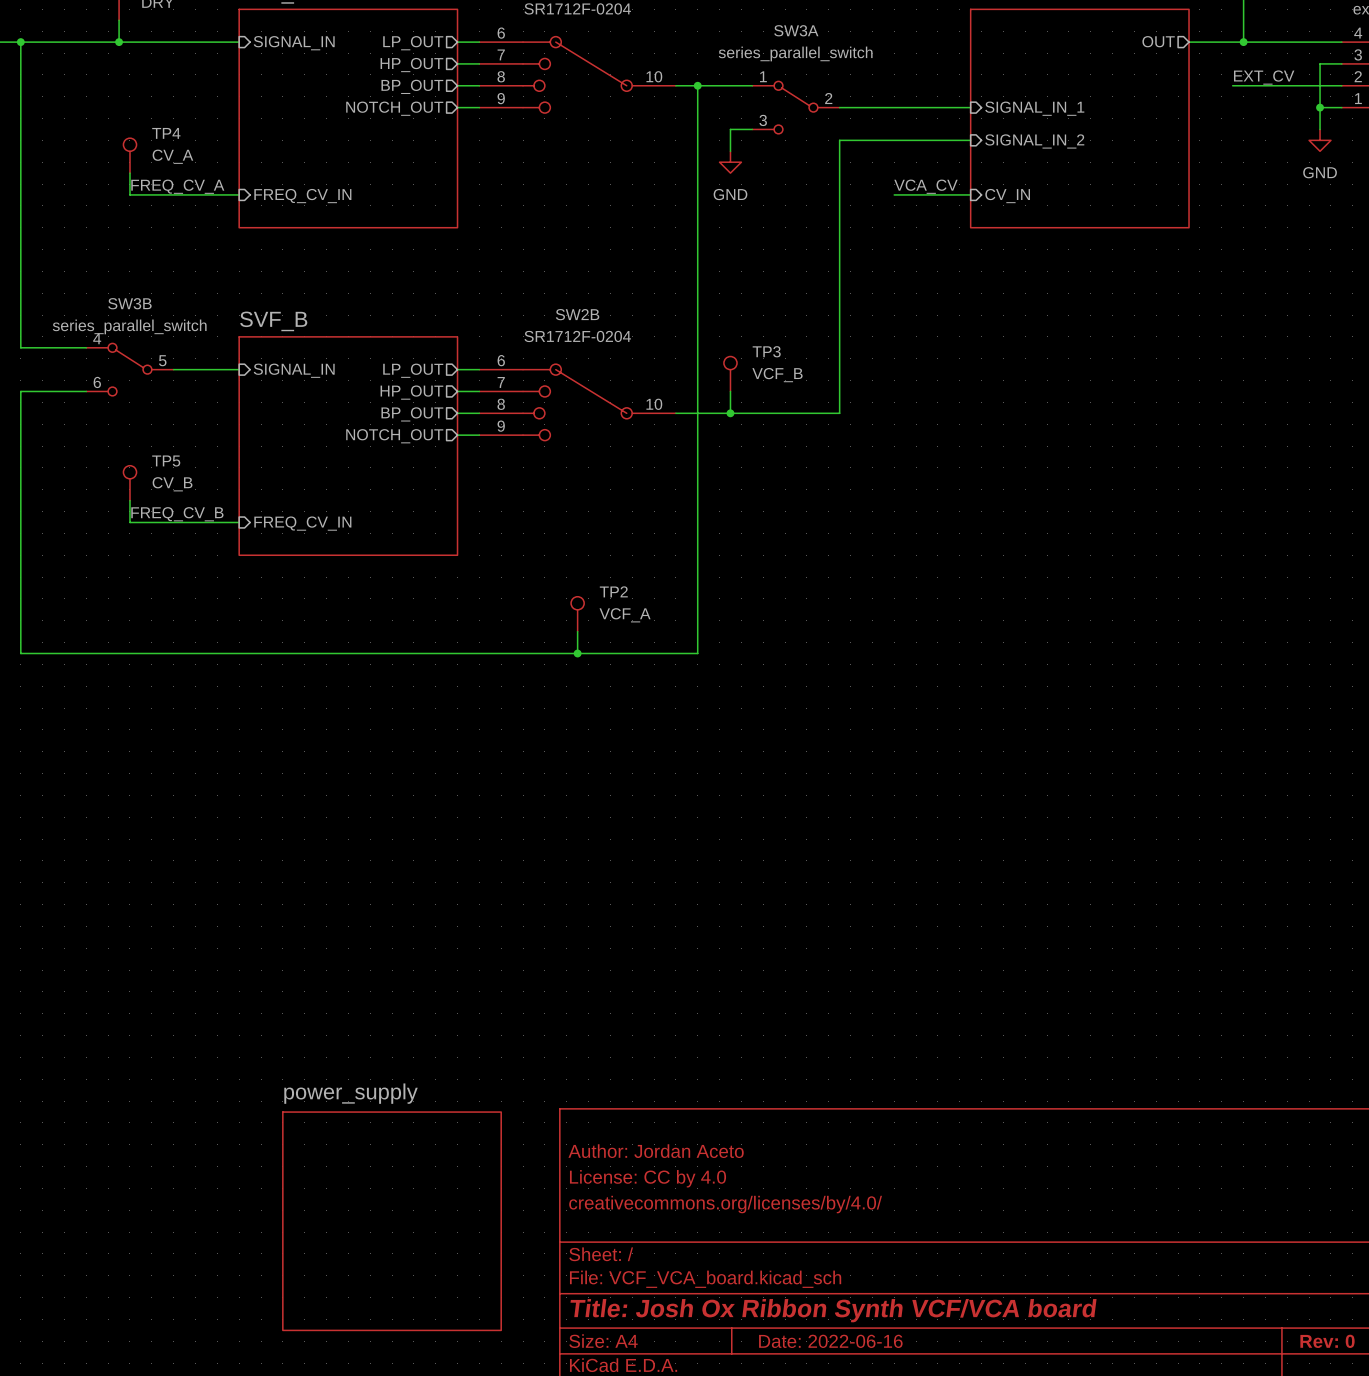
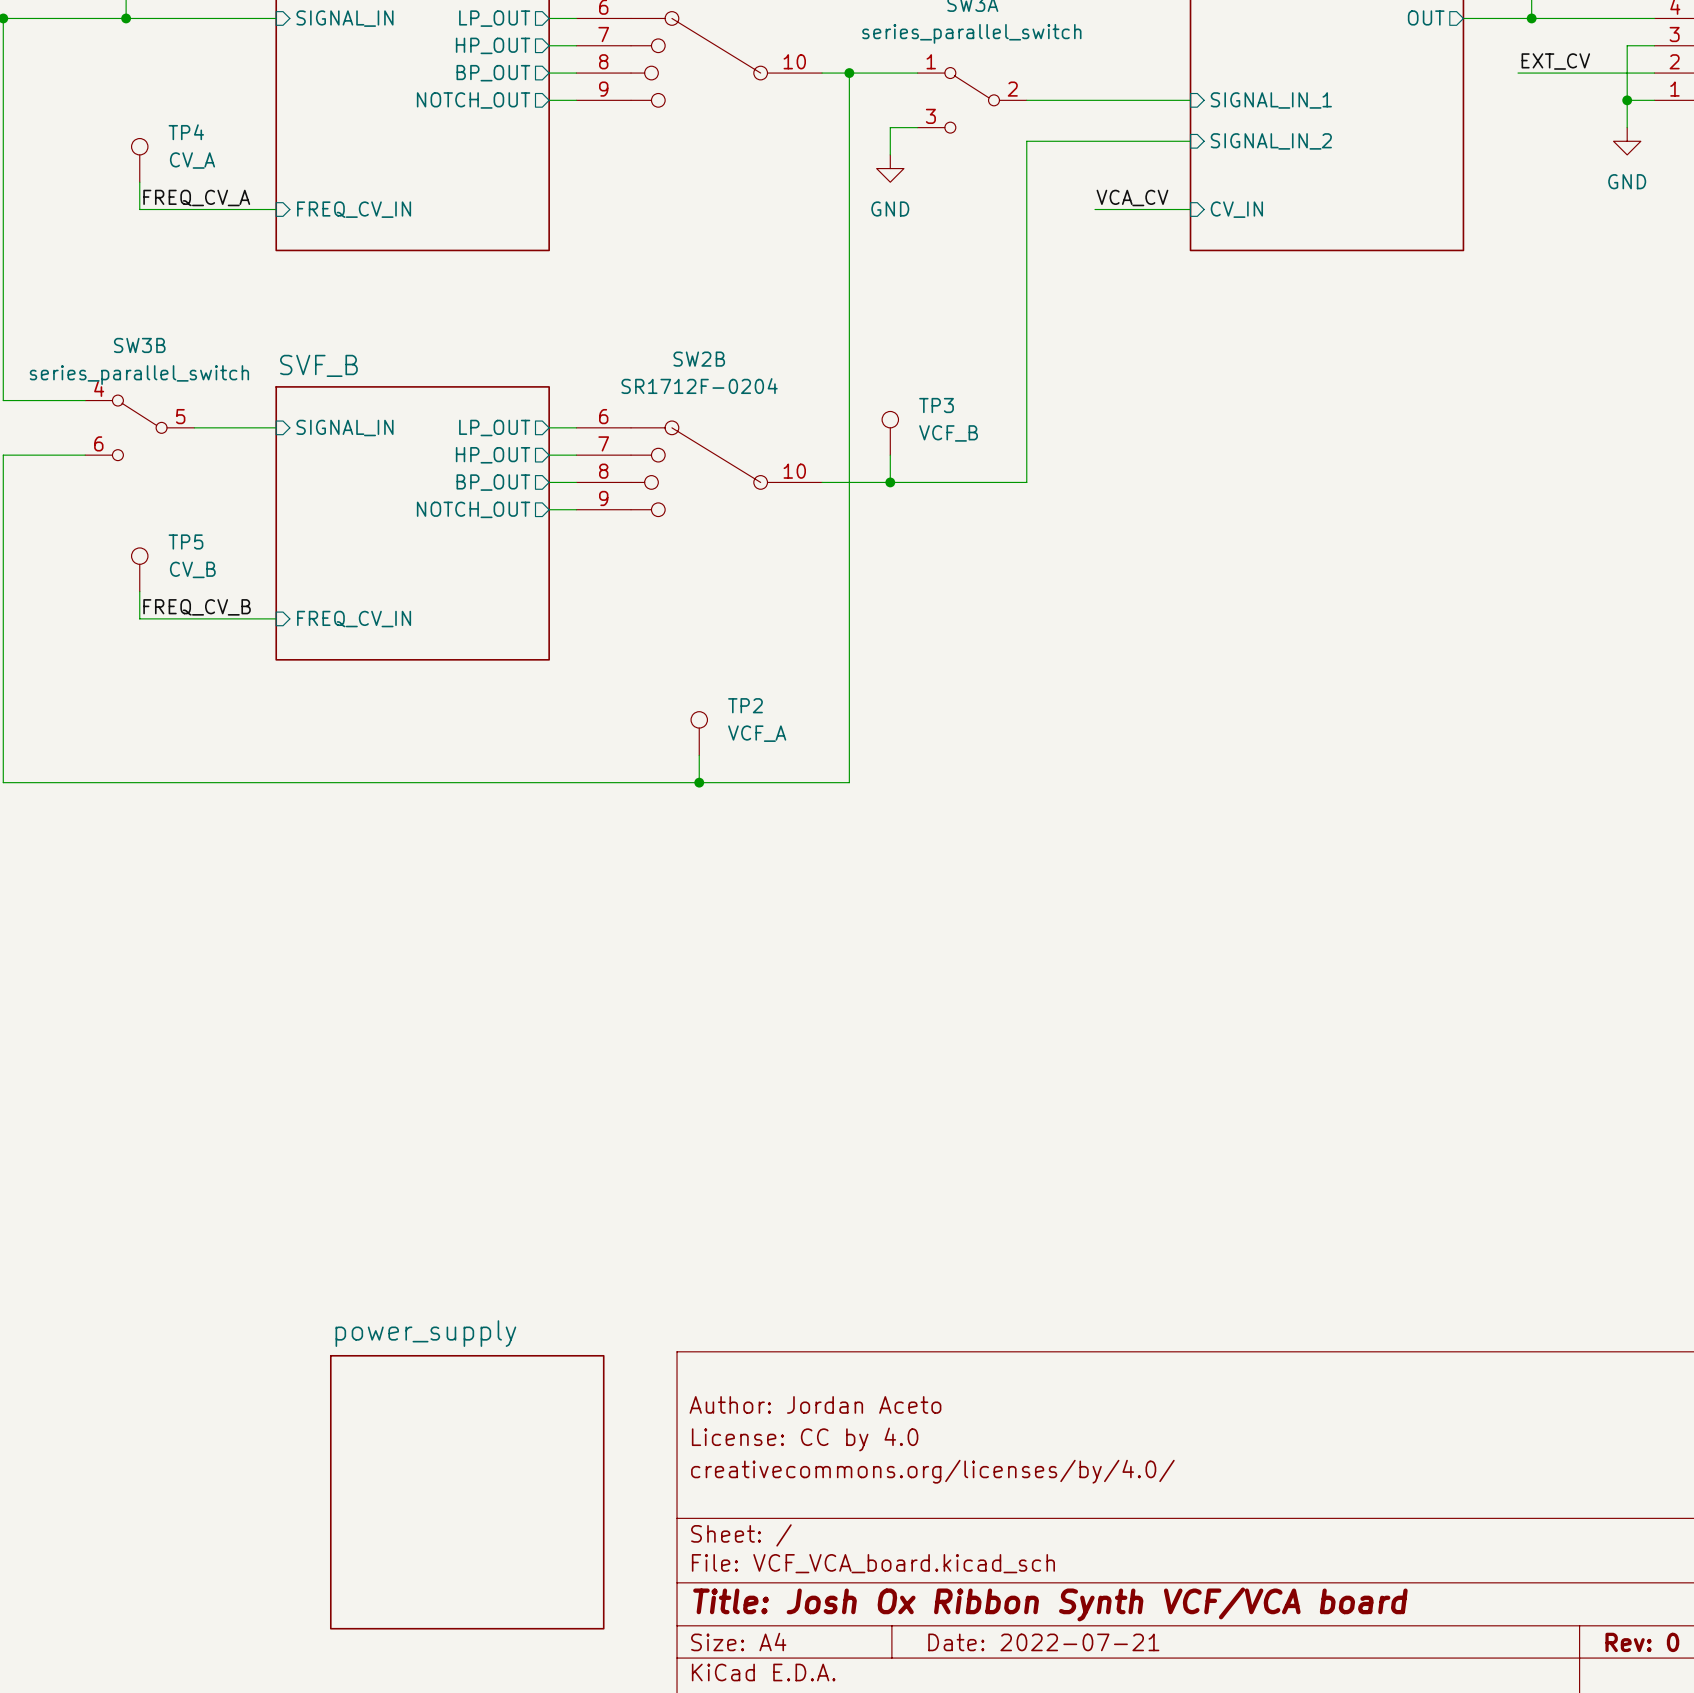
title block: Date: 2022-06-16 (830, 1341) -> Date: 2022-07-21 (1043, 1642)

